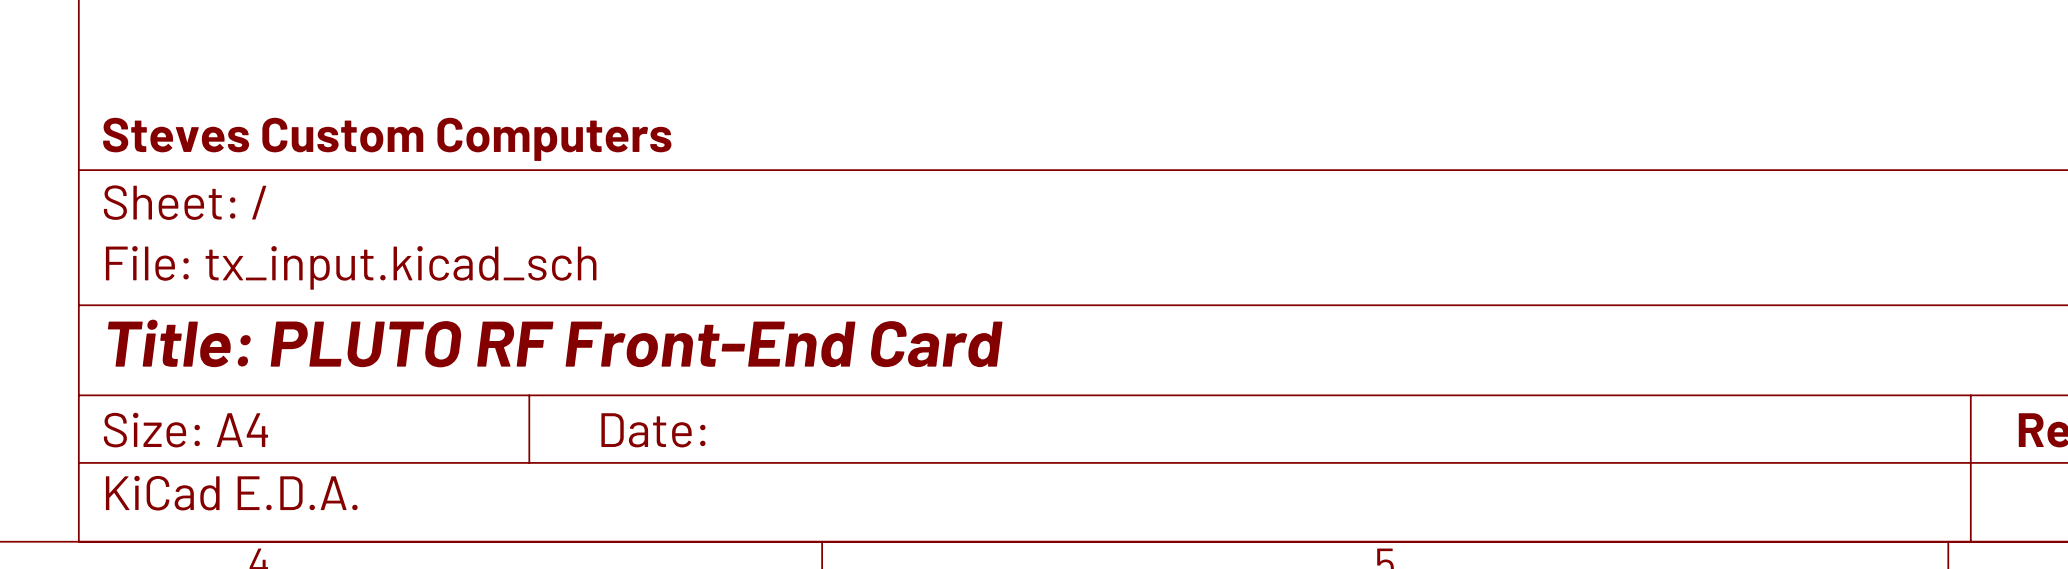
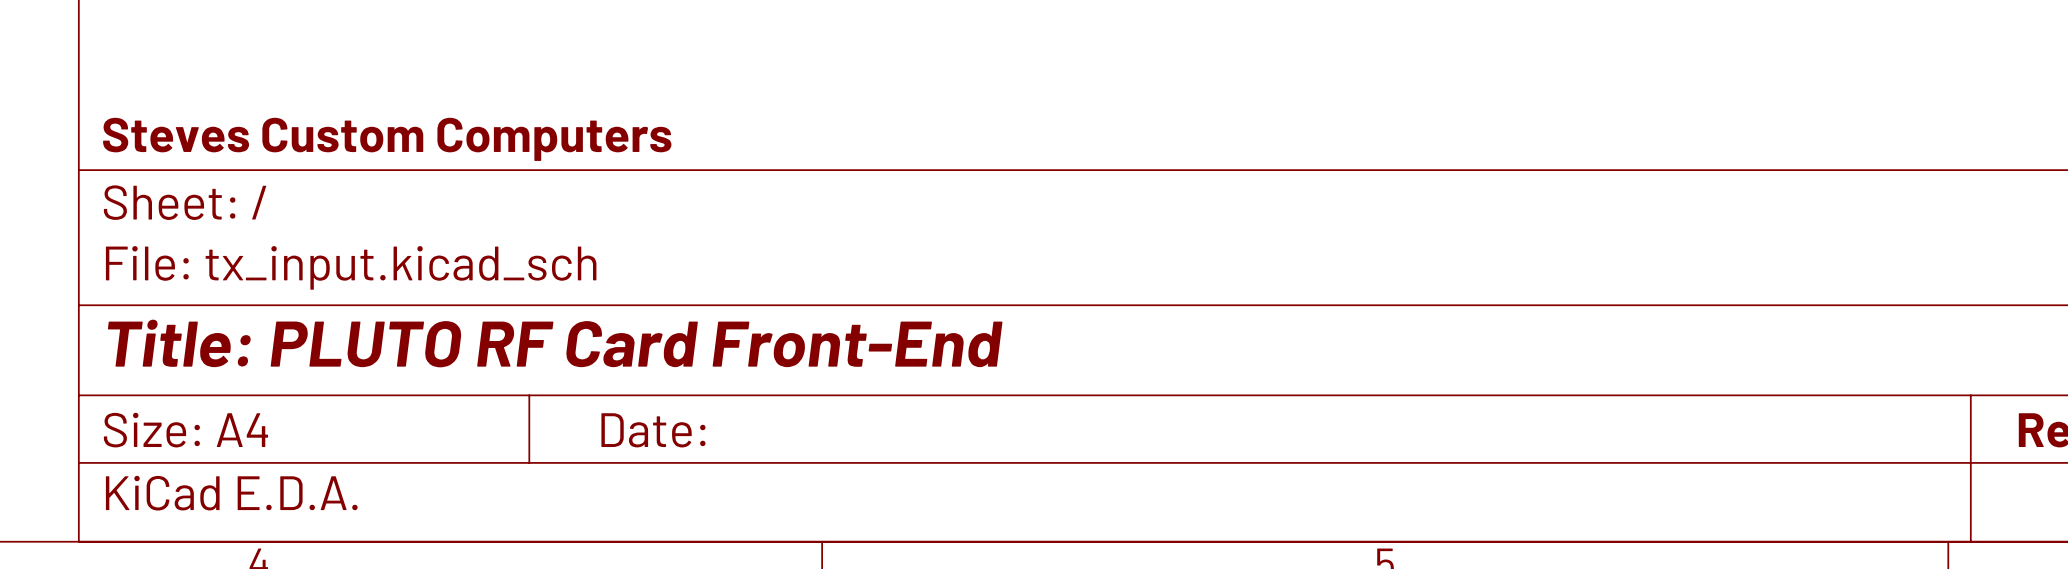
title block: Title: PLUTO RF Front-End Card (555, 343) -> Title: PLUTO RF Card Front-End (555, 343)

